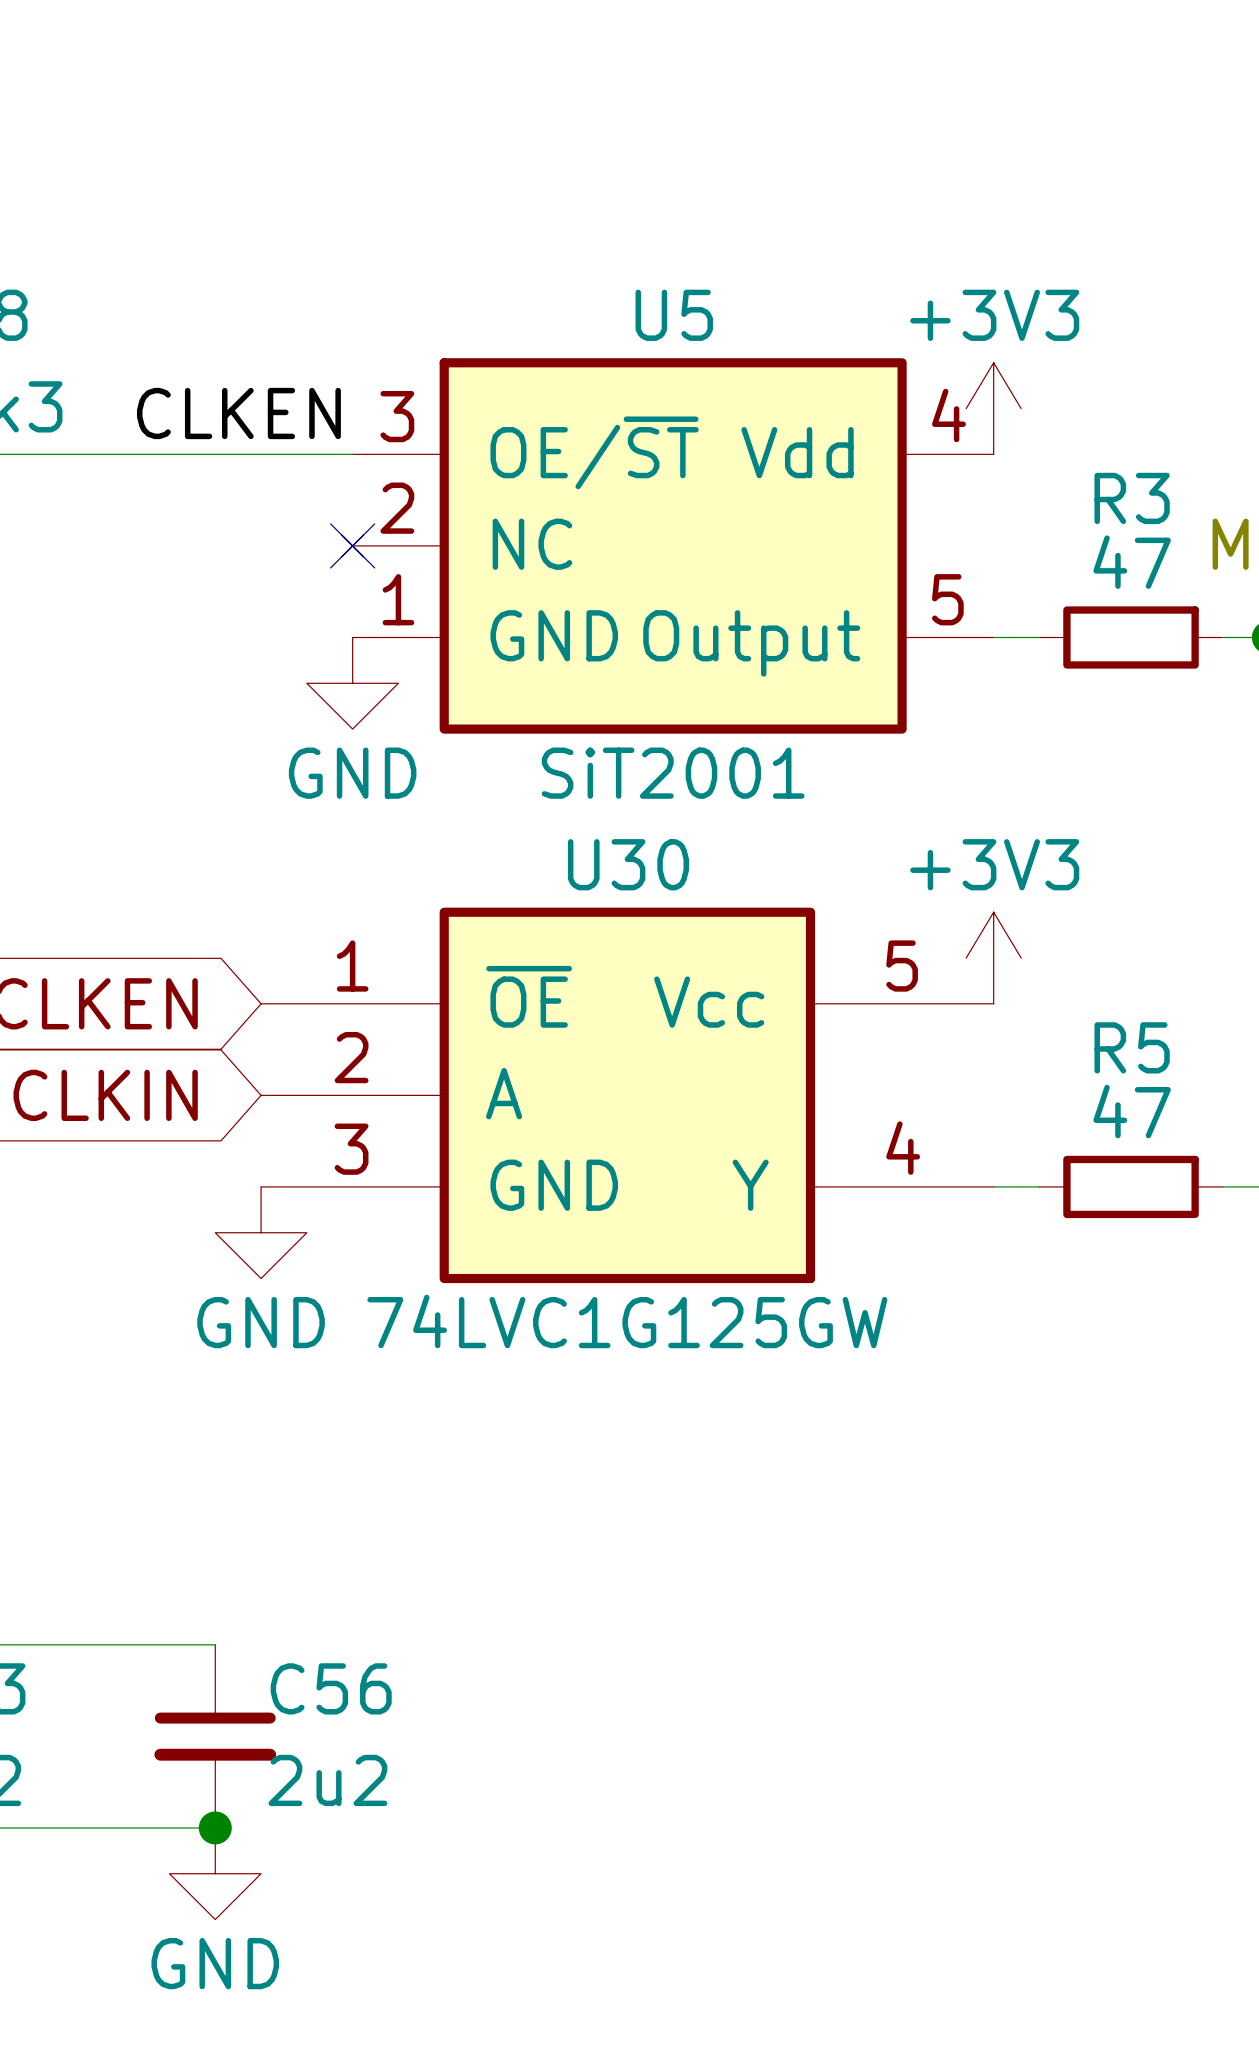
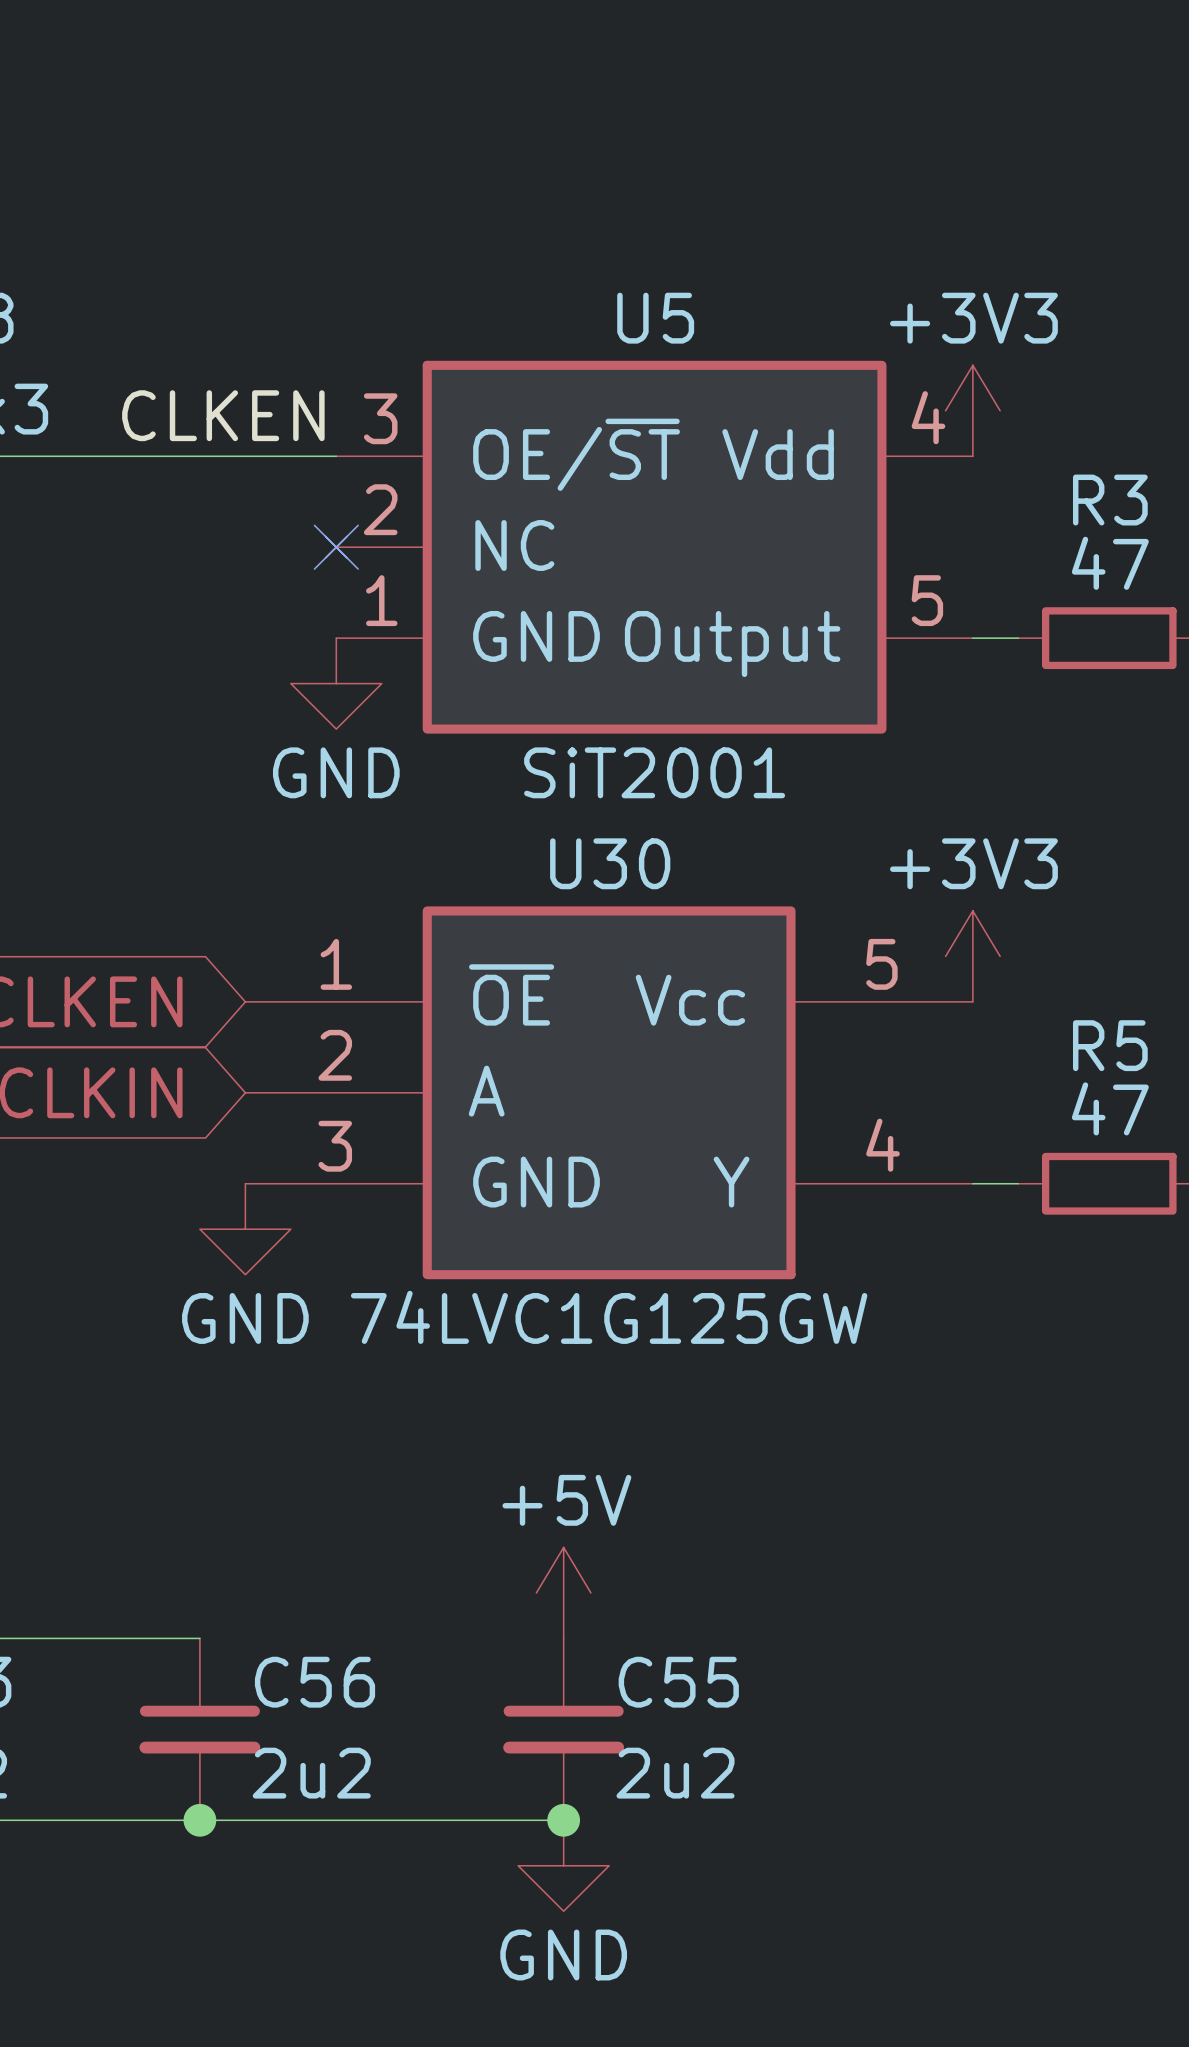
power symbol: none -> +5V (563, 1592)
C55: none -> 2u2 (563, 1729)
wire: none -> (199, 1820) (563, 1820)
junction: none -> (563, 1820)
power symbol position: GND (215, 1873) -> GND (563, 1865)

